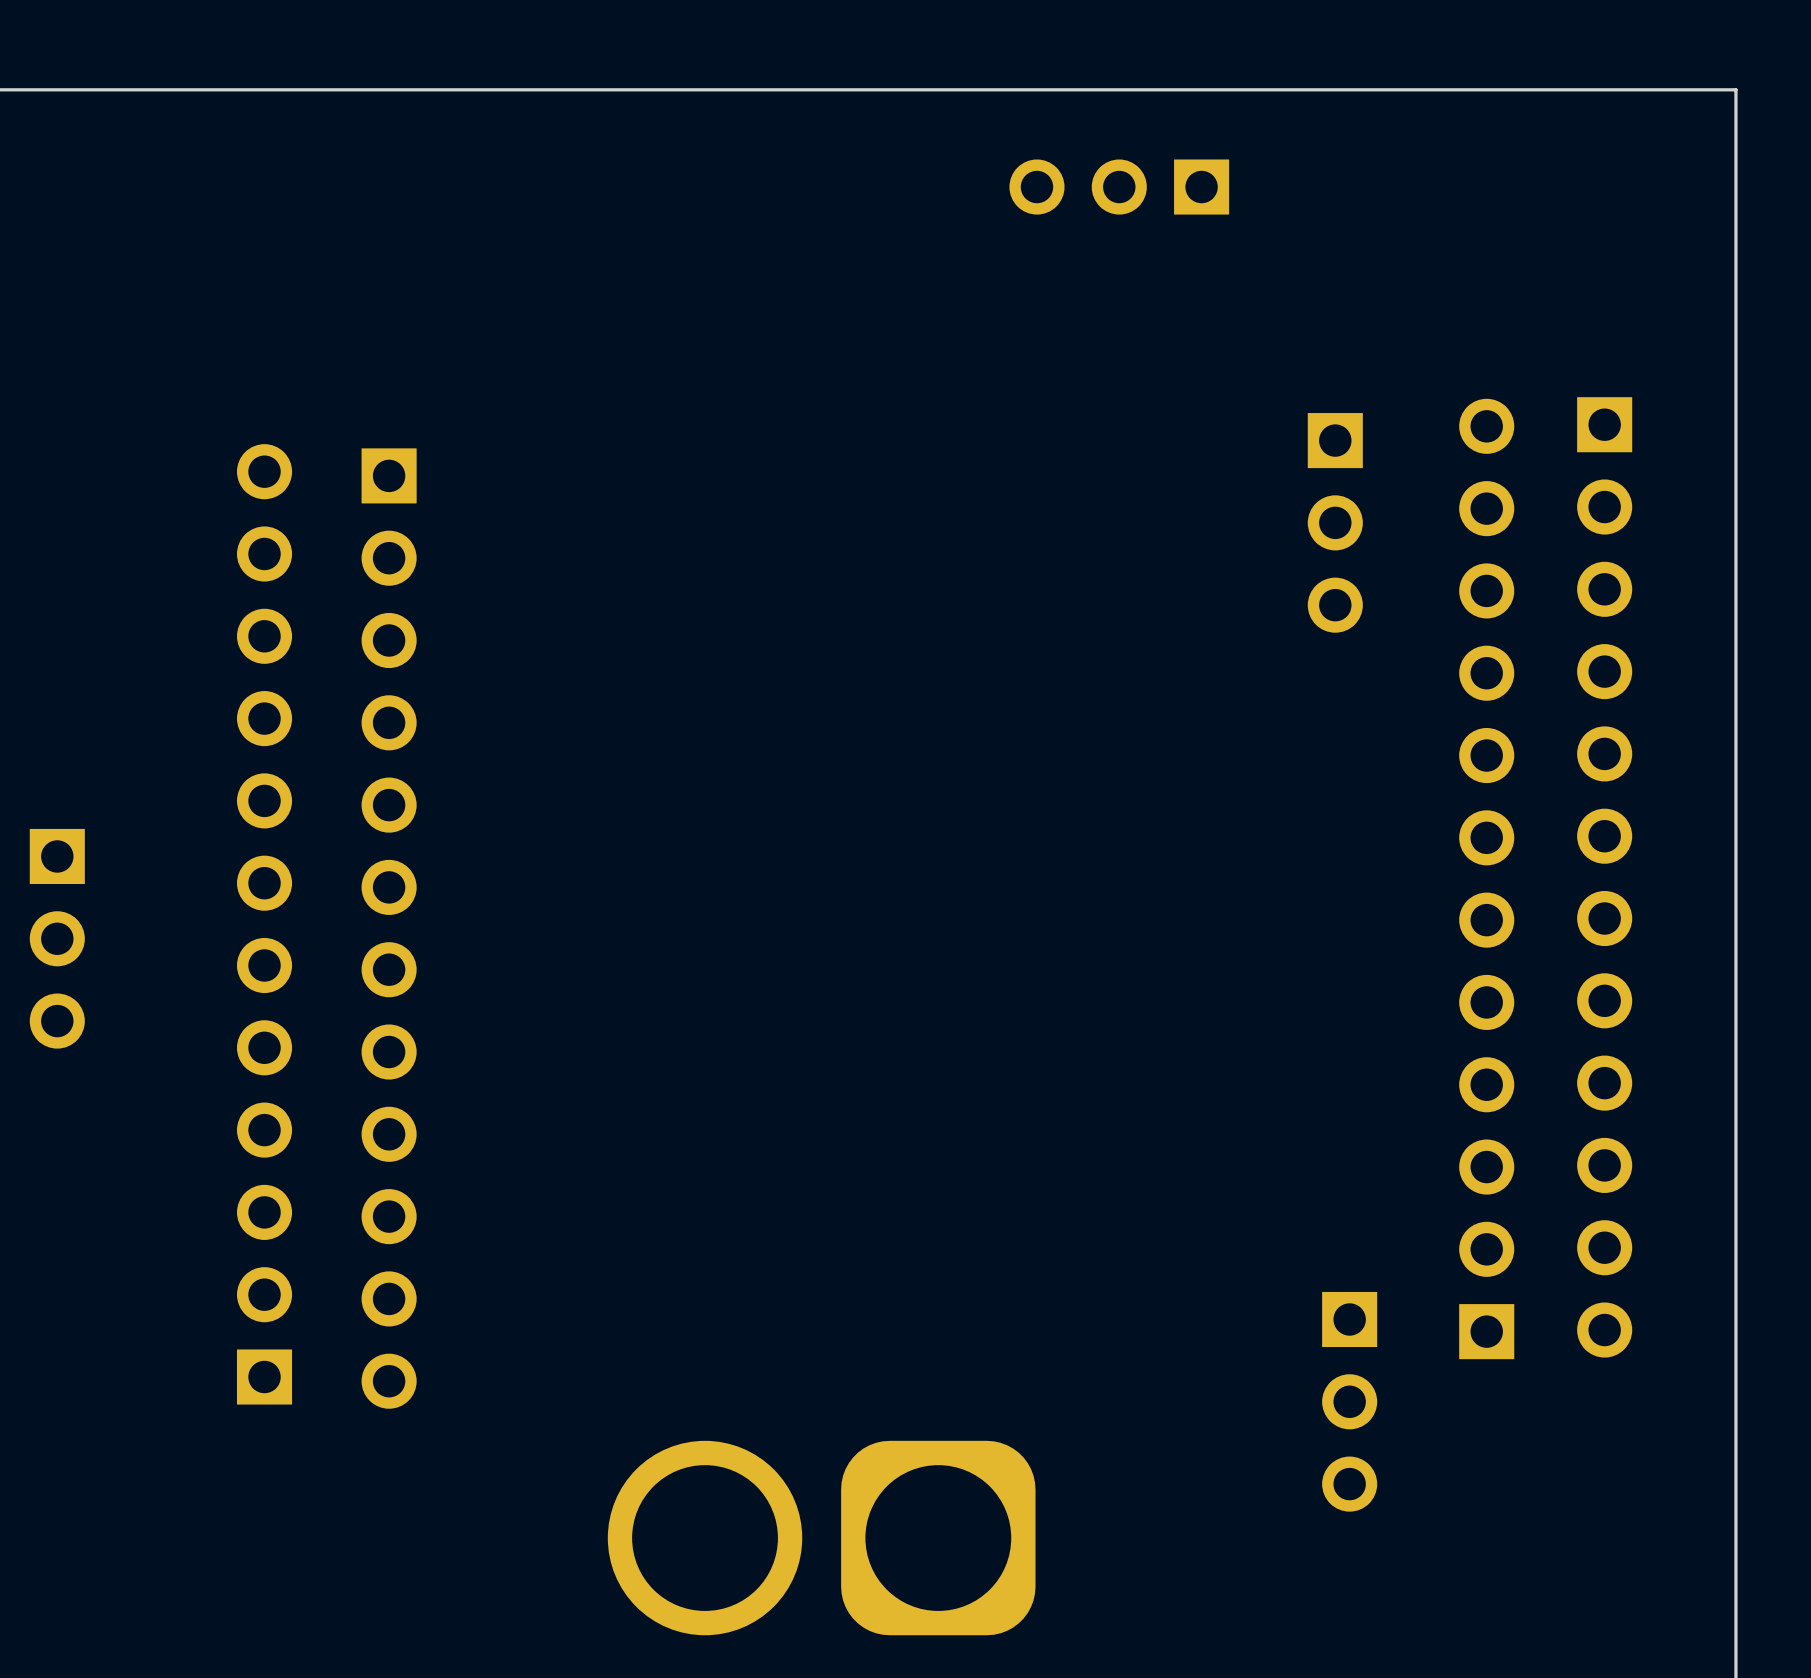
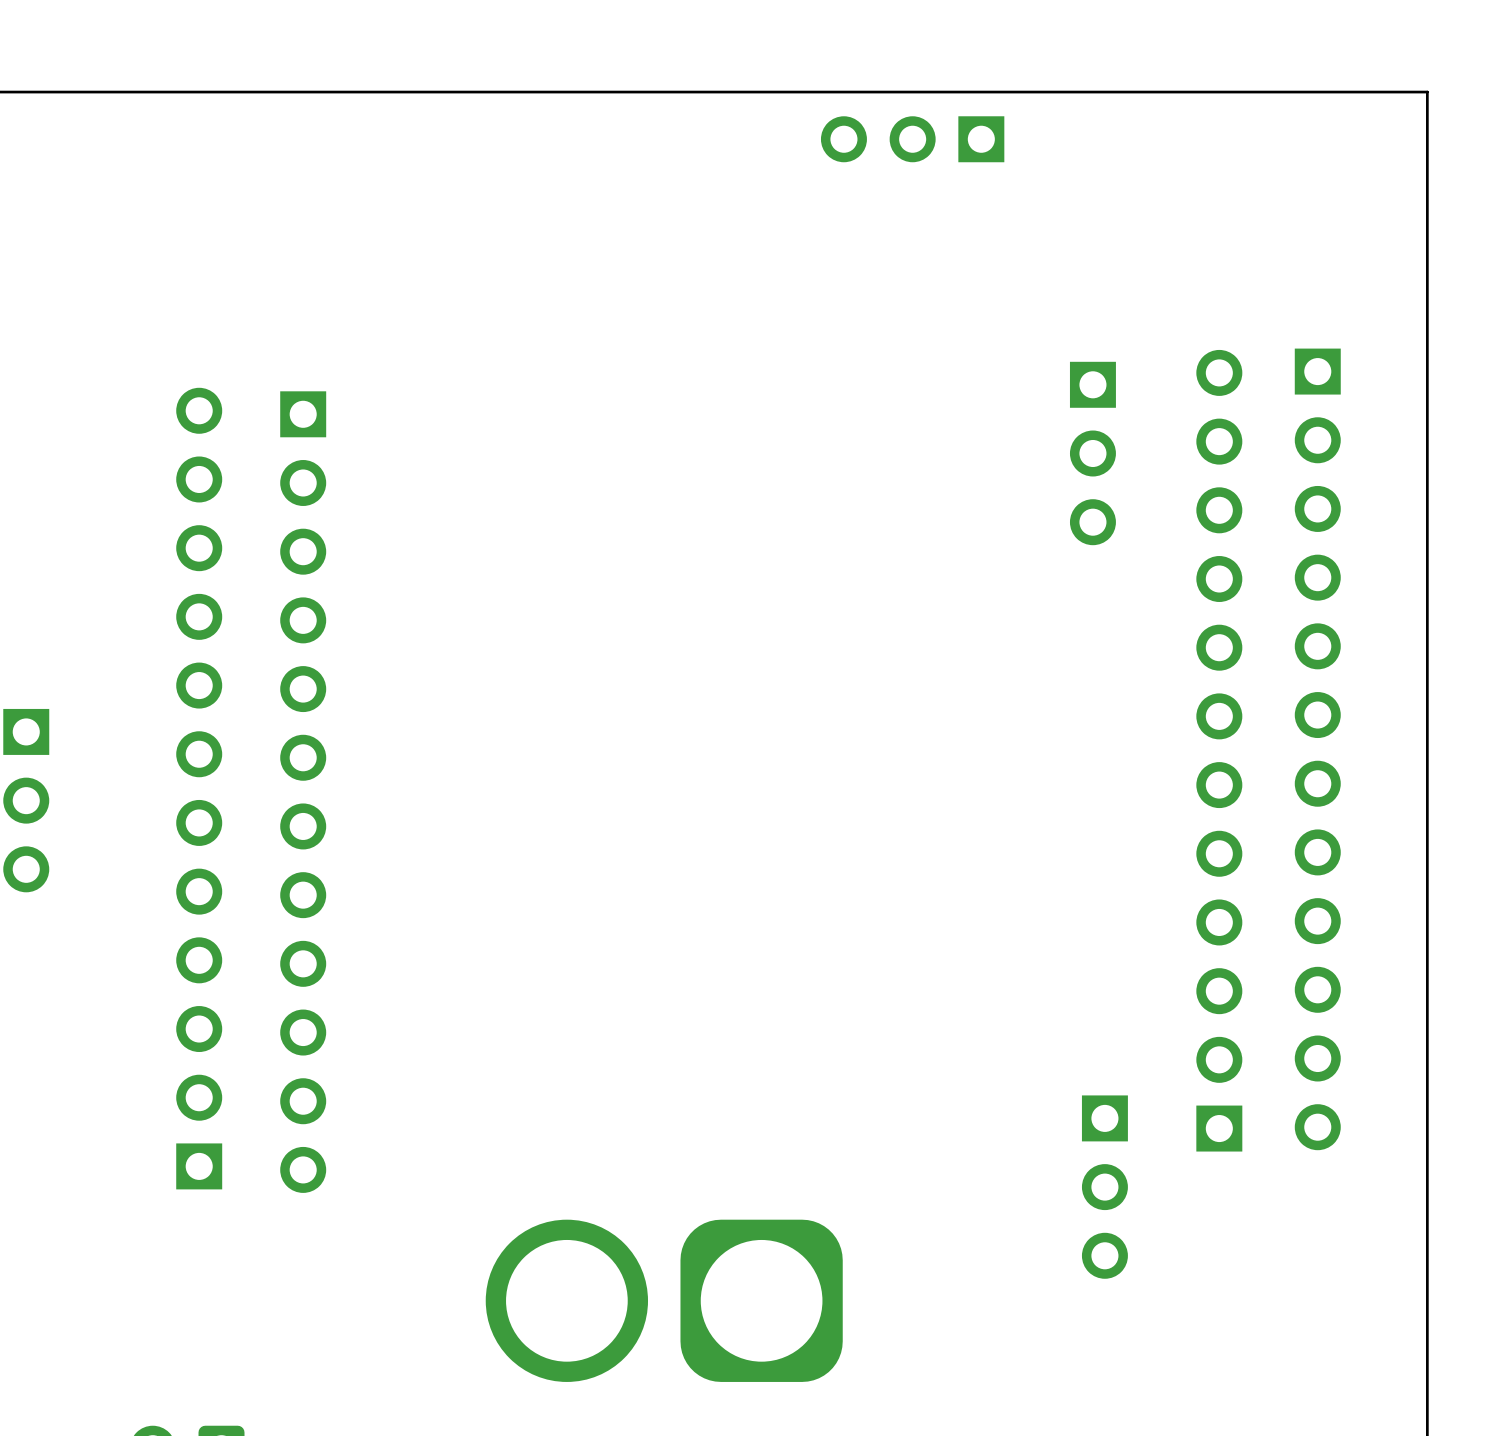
part position: (1119, 187) -> (912, 139)

